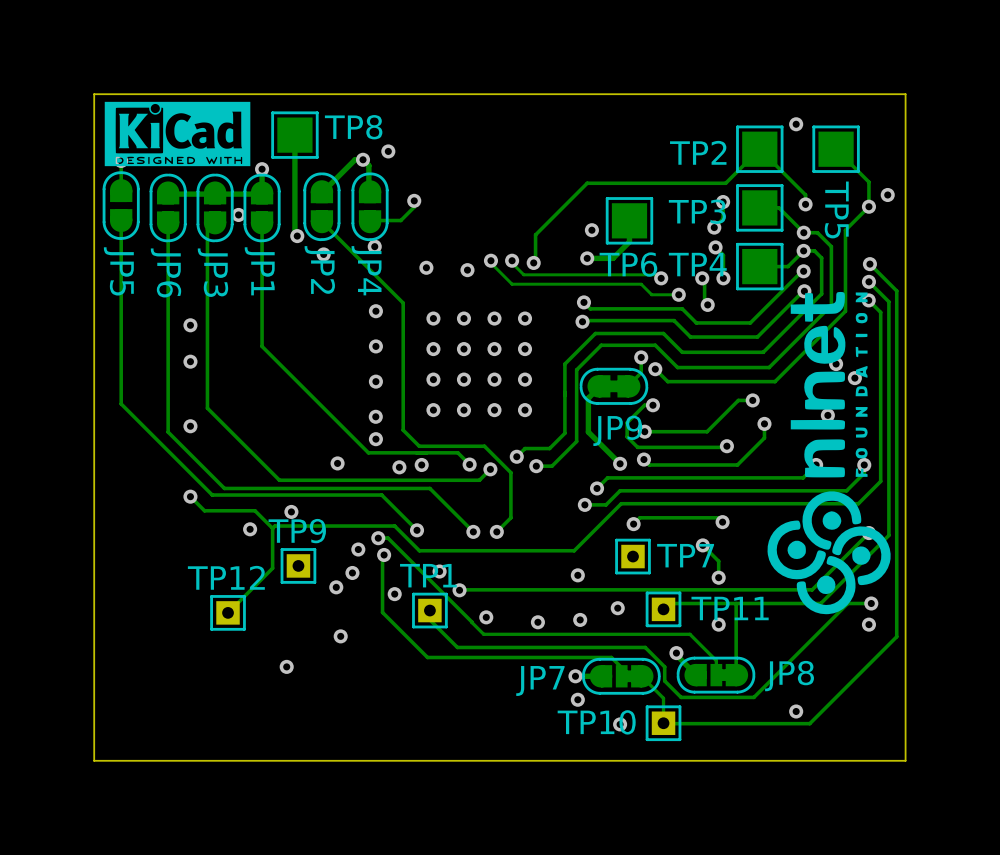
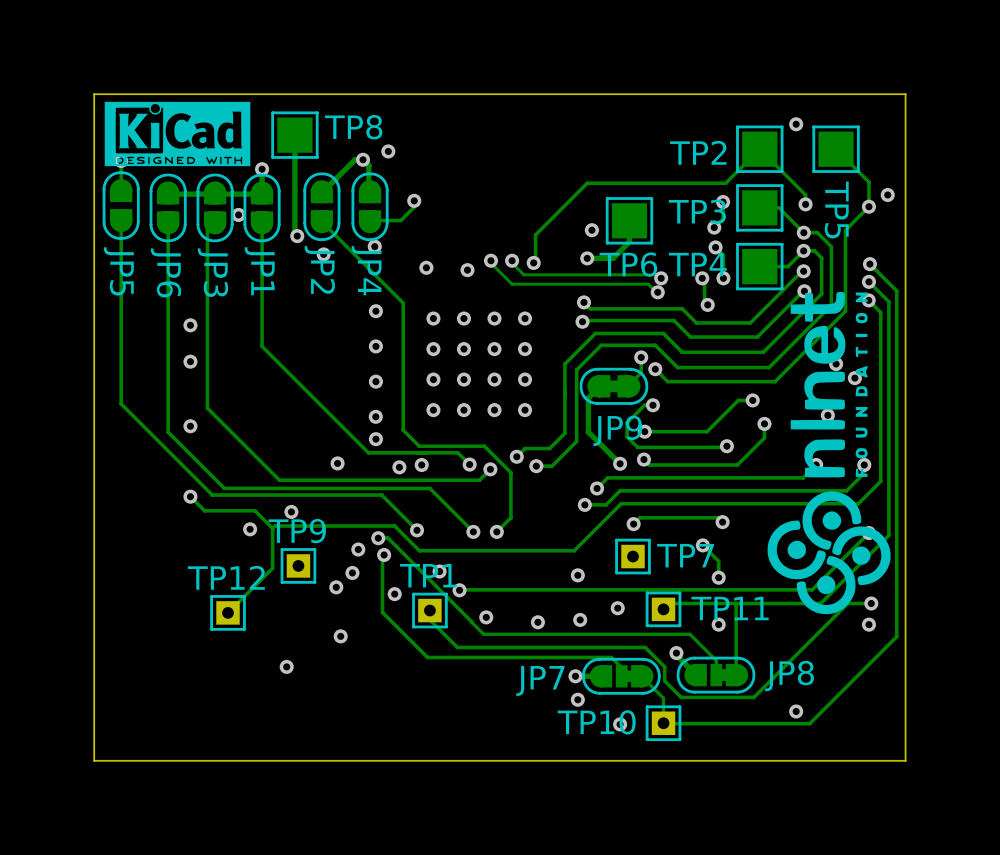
track: (641, 284) (651, 294) (678, 294) -> (641, 284) (648, 284) (657, 292)
via position: (678, 294) -> (657, 292)

